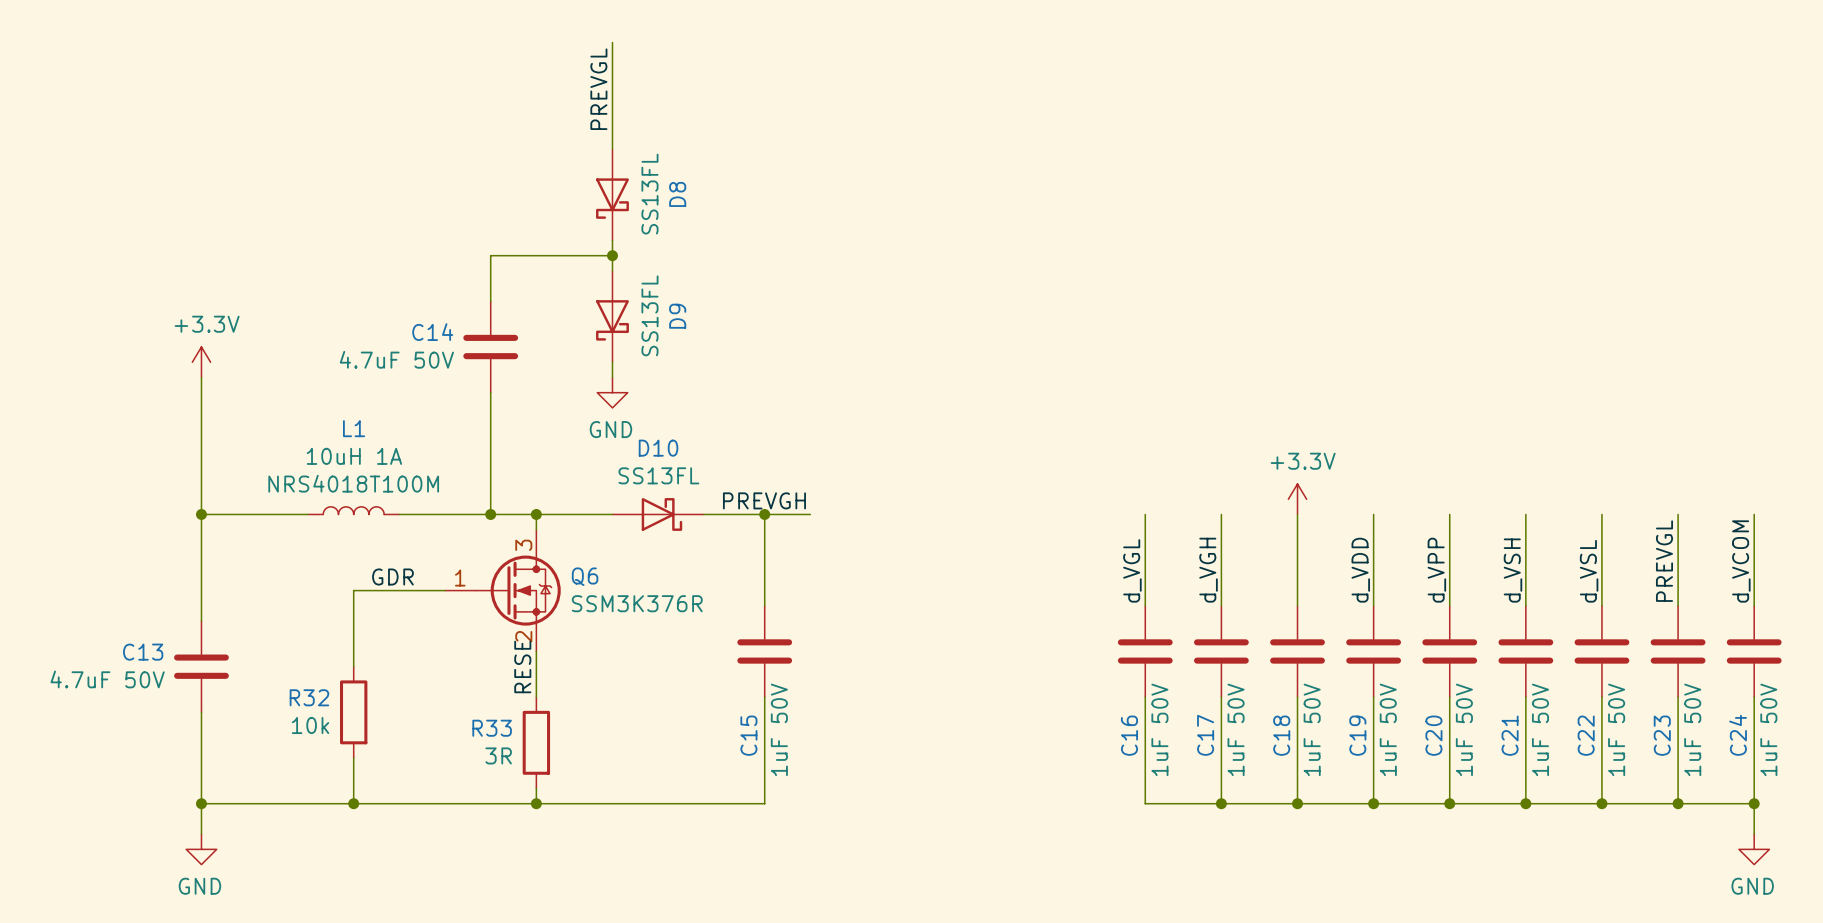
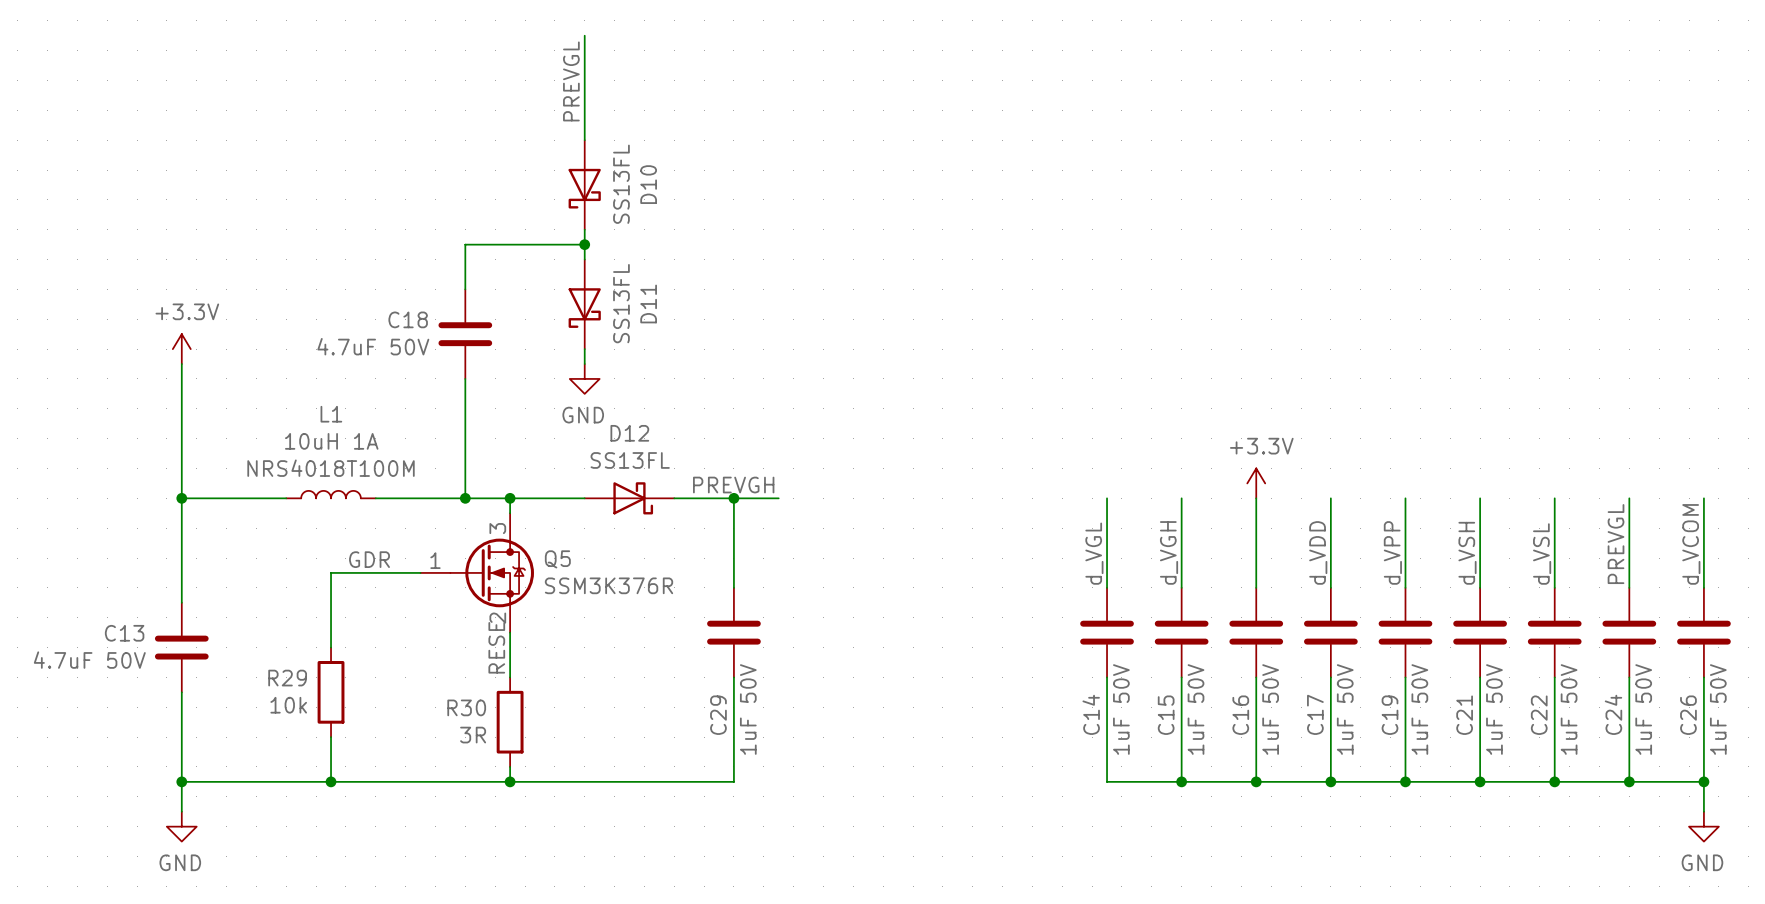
D8 name: D8 (677, 194) -> D10 (648, 184)
D9 name: D9 (677, 316) -> D11 (648, 303)
C14 name: C14 (432, 332) -> C18 (408, 319)
D10 name: D10 (658, 448) -> D12 (629, 433)
Q6 name: Q6 (585, 576) -> Q5 (557, 559)
R32 name: R32 (309, 697) -> R29 (287, 678)
R33 name: R33 (492, 728) -> R30 (466, 707)
C15 name: C15 (748, 735) -> C29 (718, 715)
C16 name: C16 (1129, 735) -> C14 (1091, 714)
C17 name: C17 (1205, 735) -> C15 (1166, 715)
C18 name: C18 (1281, 735) -> C16 (1240, 715)
C19 name: C19 (1357, 735) -> C17 (1315, 714)
C20 name: C20 (1433, 735) -> C19 (1390, 715)
C23 name: C23 (1662, 735) -> C24 (1613, 714)
C24 name: C24 (1738, 735) -> C26 (1688, 715)

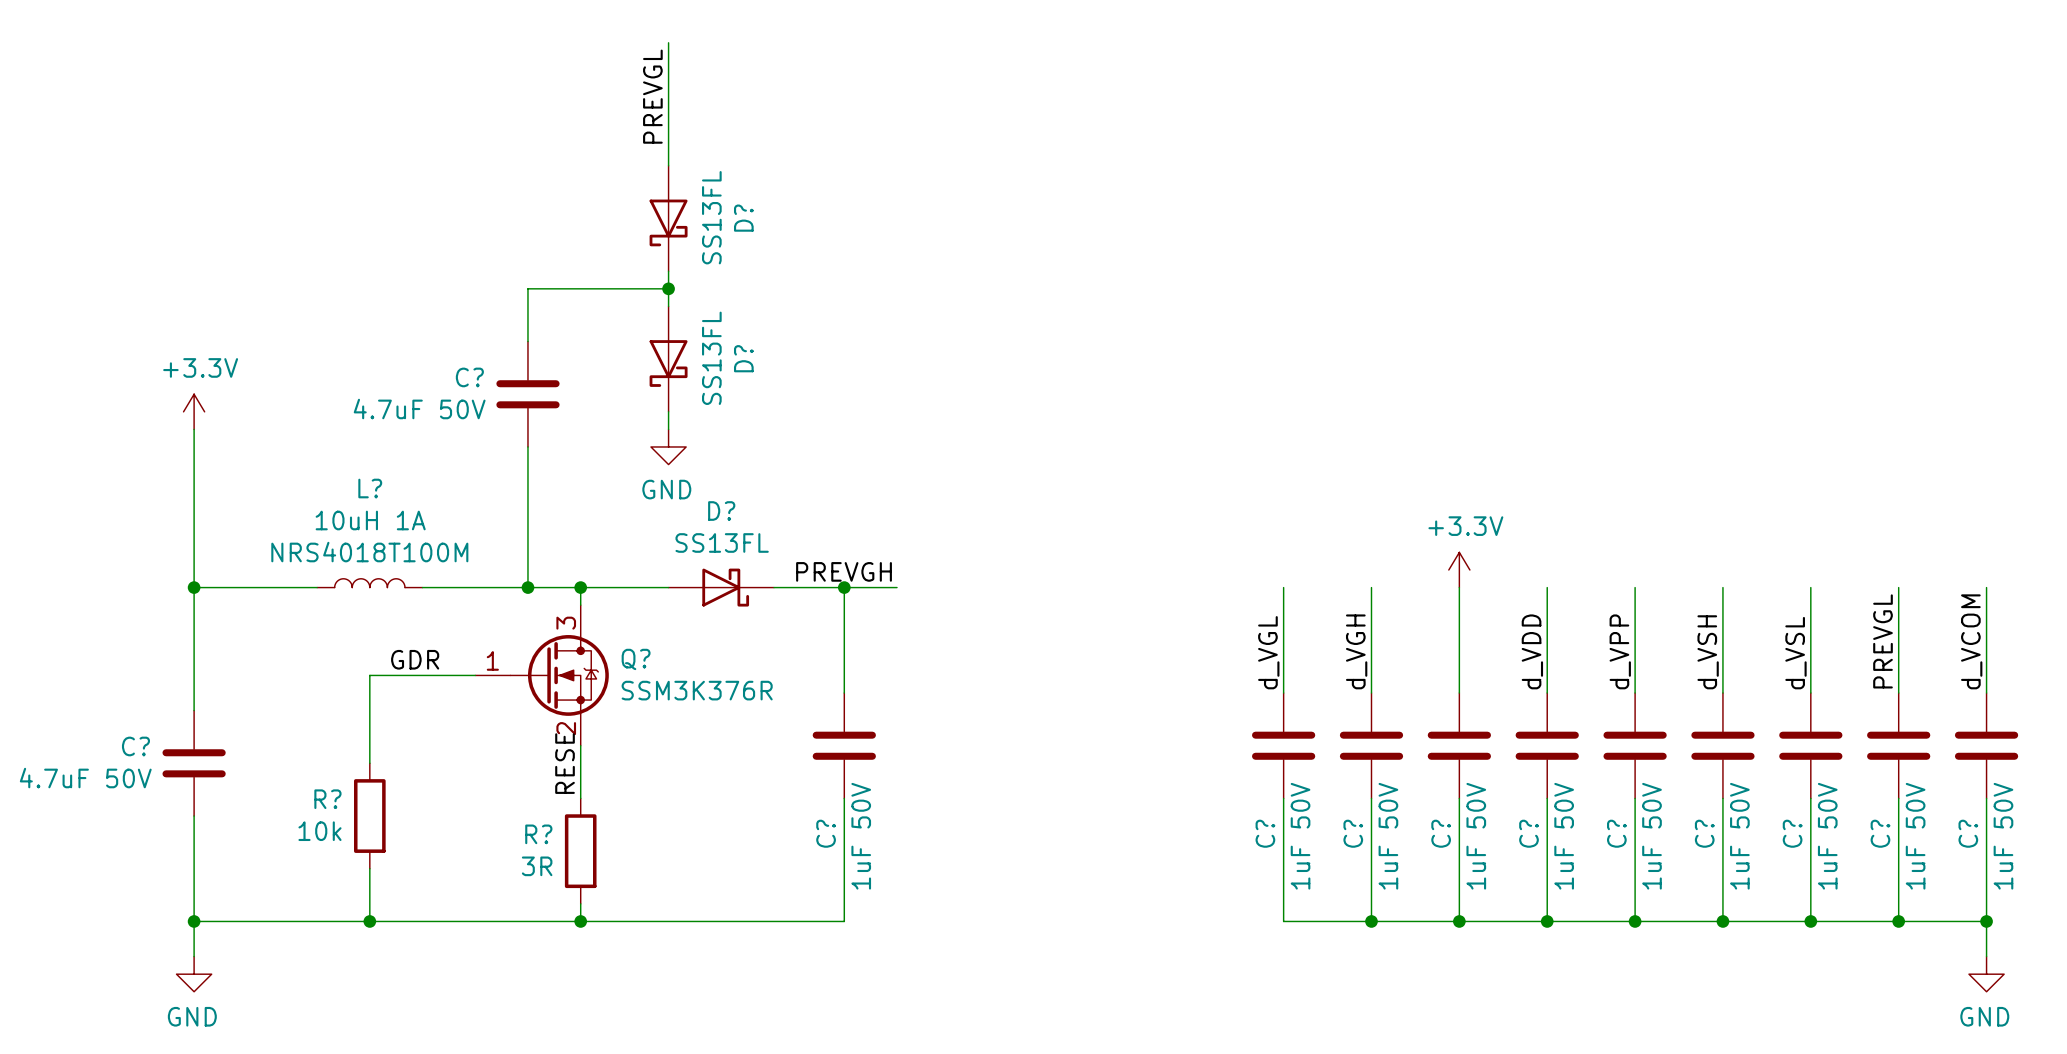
D10 name: D10 (648, 184) -> D? (743, 218)
D11 name: D11 (648, 303) -> D? (743, 358)
C18 name: C18 (408, 319) -> C? (469, 377)
L1 name: L1 (331, 414) -> L? (370, 488)
D12 name: D12 (629, 433) -> D? (721, 511)
Q5 name: Q5 (557, 559) -> Q? (636, 659)
C13 name: C13 (124, 633) -> C? (135, 746)
R29 name: R29 (287, 678) -> R? (327, 799)
R30 name: R30 (466, 707) -> R? (538, 834)
C14 name: C14 (1091, 714) -> C? (1265, 833)
C17 name: C17 (1315, 714) -> C? (1528, 833)
C24 name: C24 (1613, 714) -> C? (1880, 833)
C29 name: C29 (718, 715) -> C? (826, 833)
C15 name: C15 (1166, 715) -> C? (1353, 833)
C16 name: C16 (1240, 715) -> C? (1441, 833)
C19 name: C19 (1390, 715) -> C? (1616, 833)
C21 name: C21 (1464, 715) -> C? (1704, 833)
C22 name: C22 (1539, 715) -> C? (1792, 833)
C26 name: C26 (1688, 715) -> C? (1968, 833)

